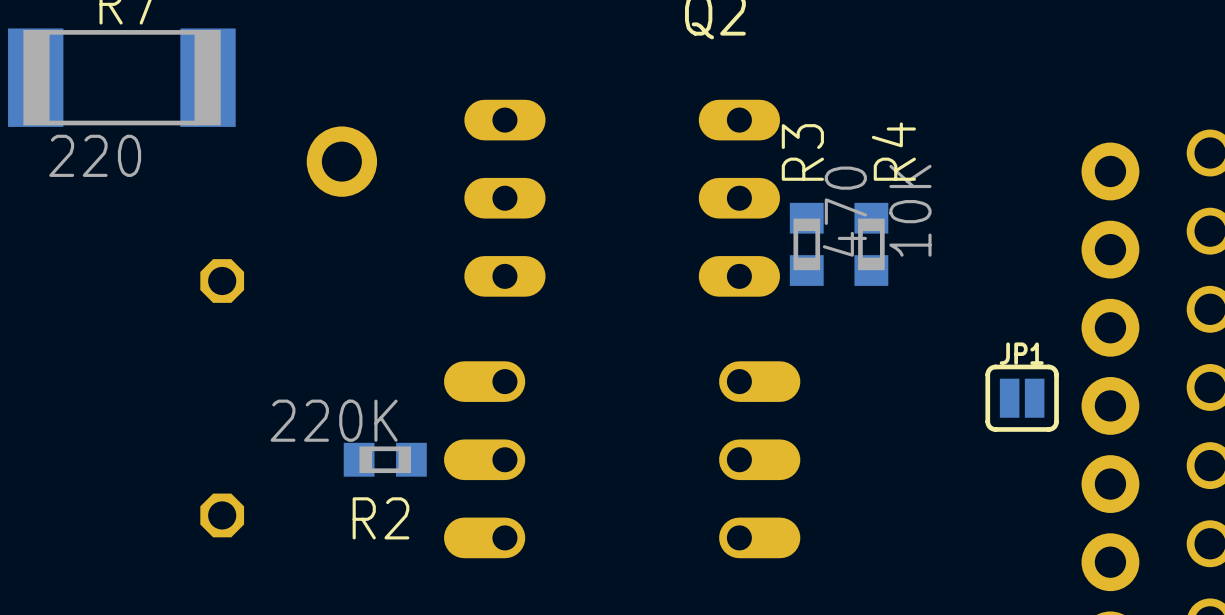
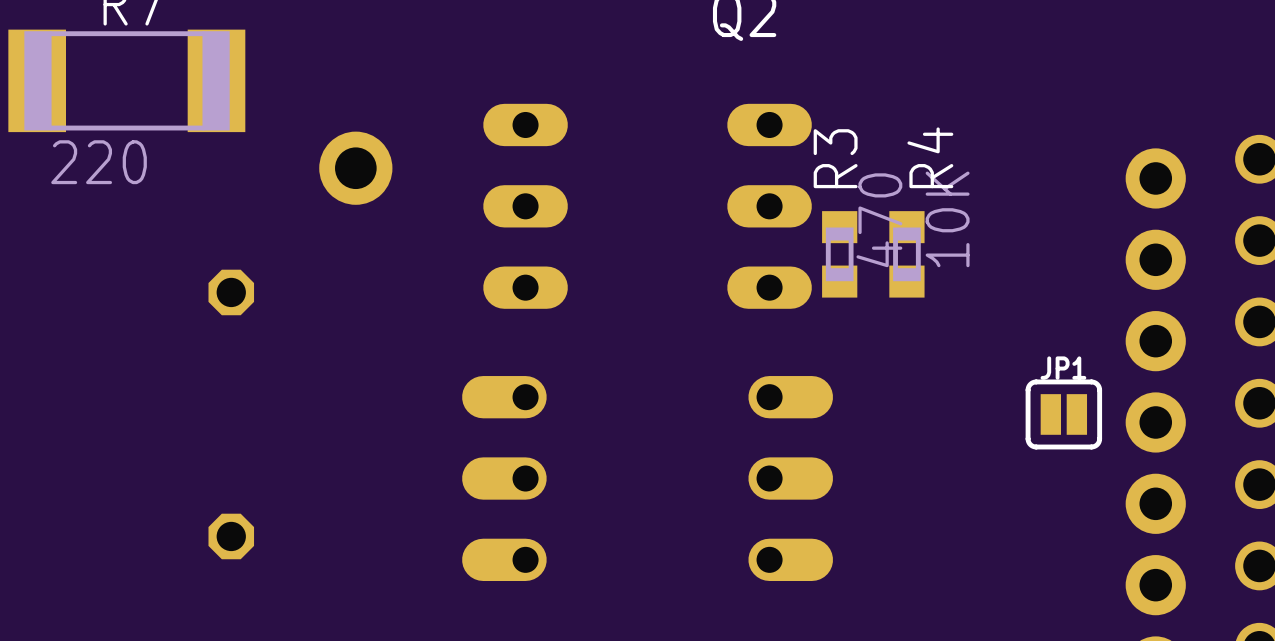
R2: 220K (385, 459) -> none

